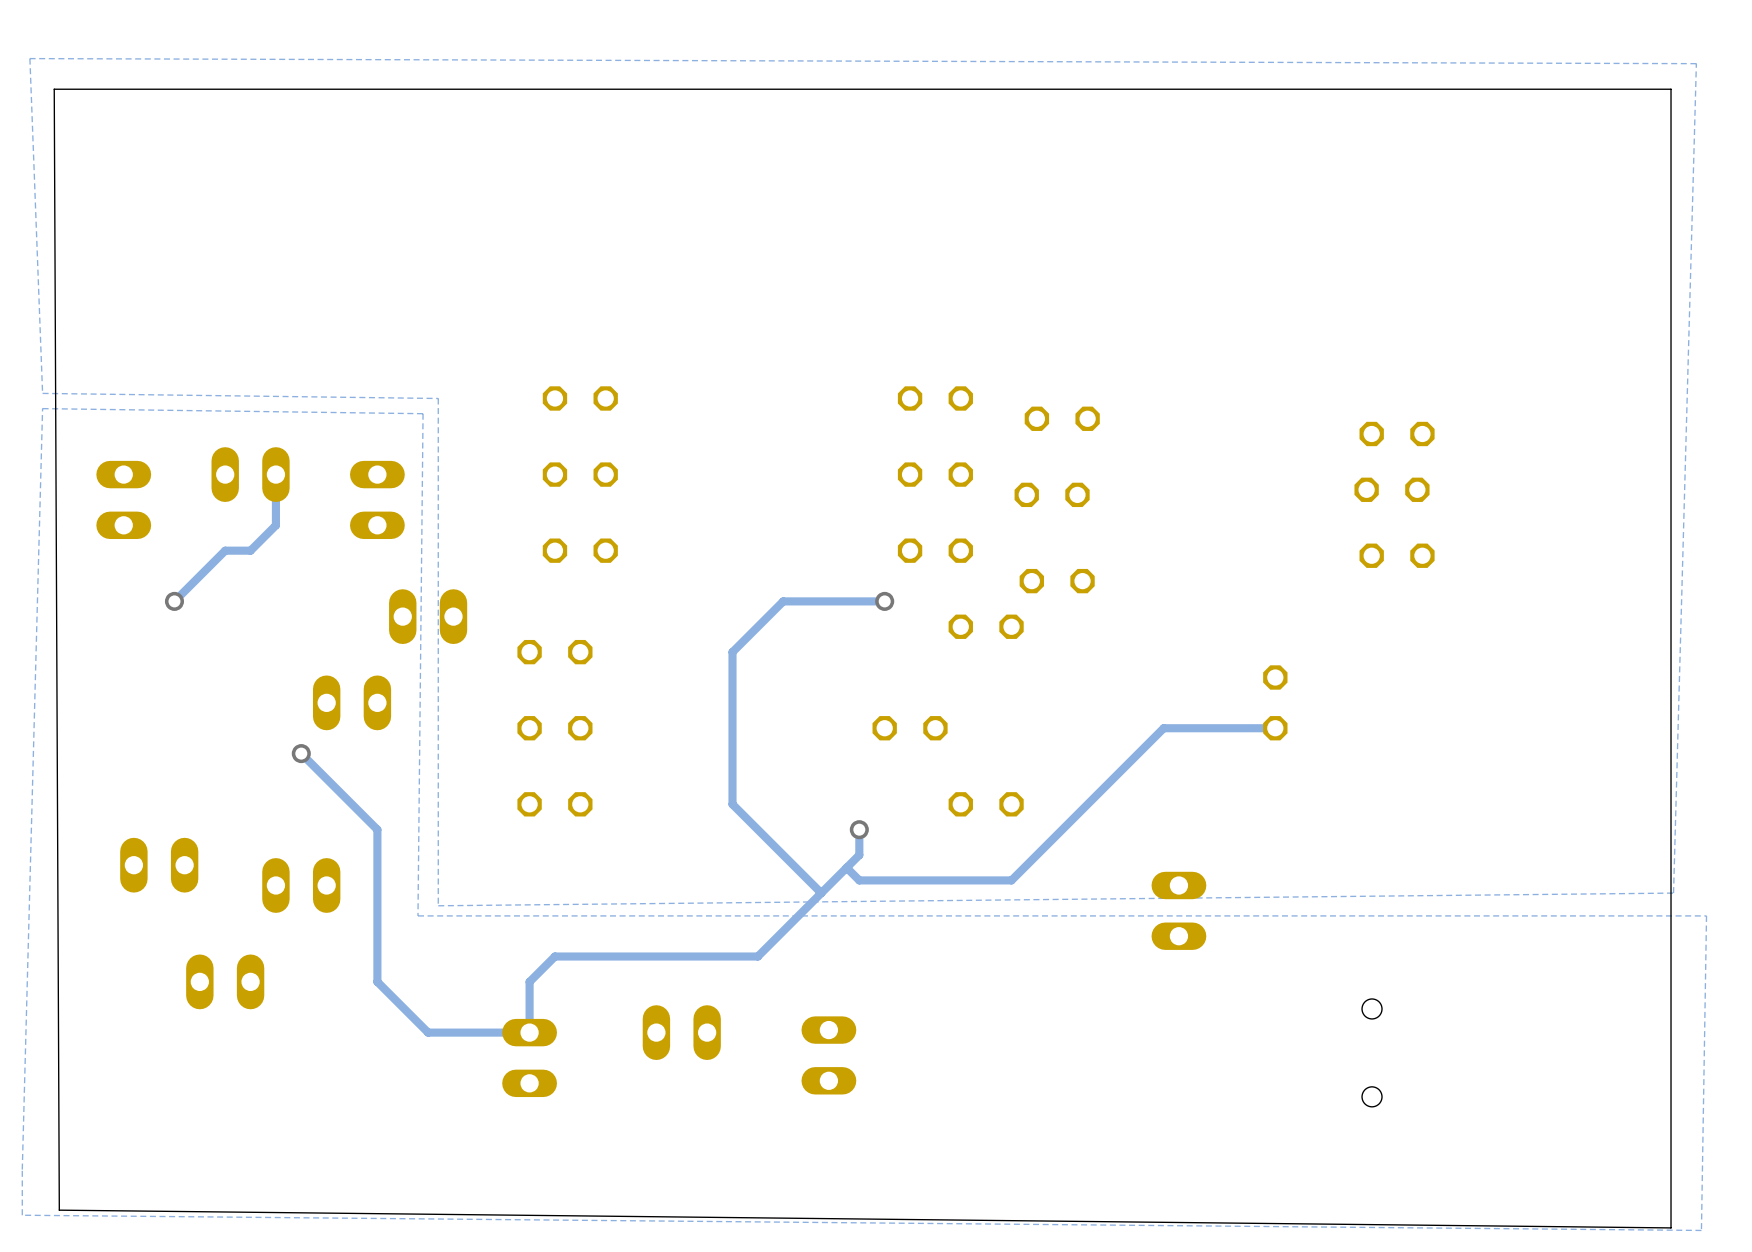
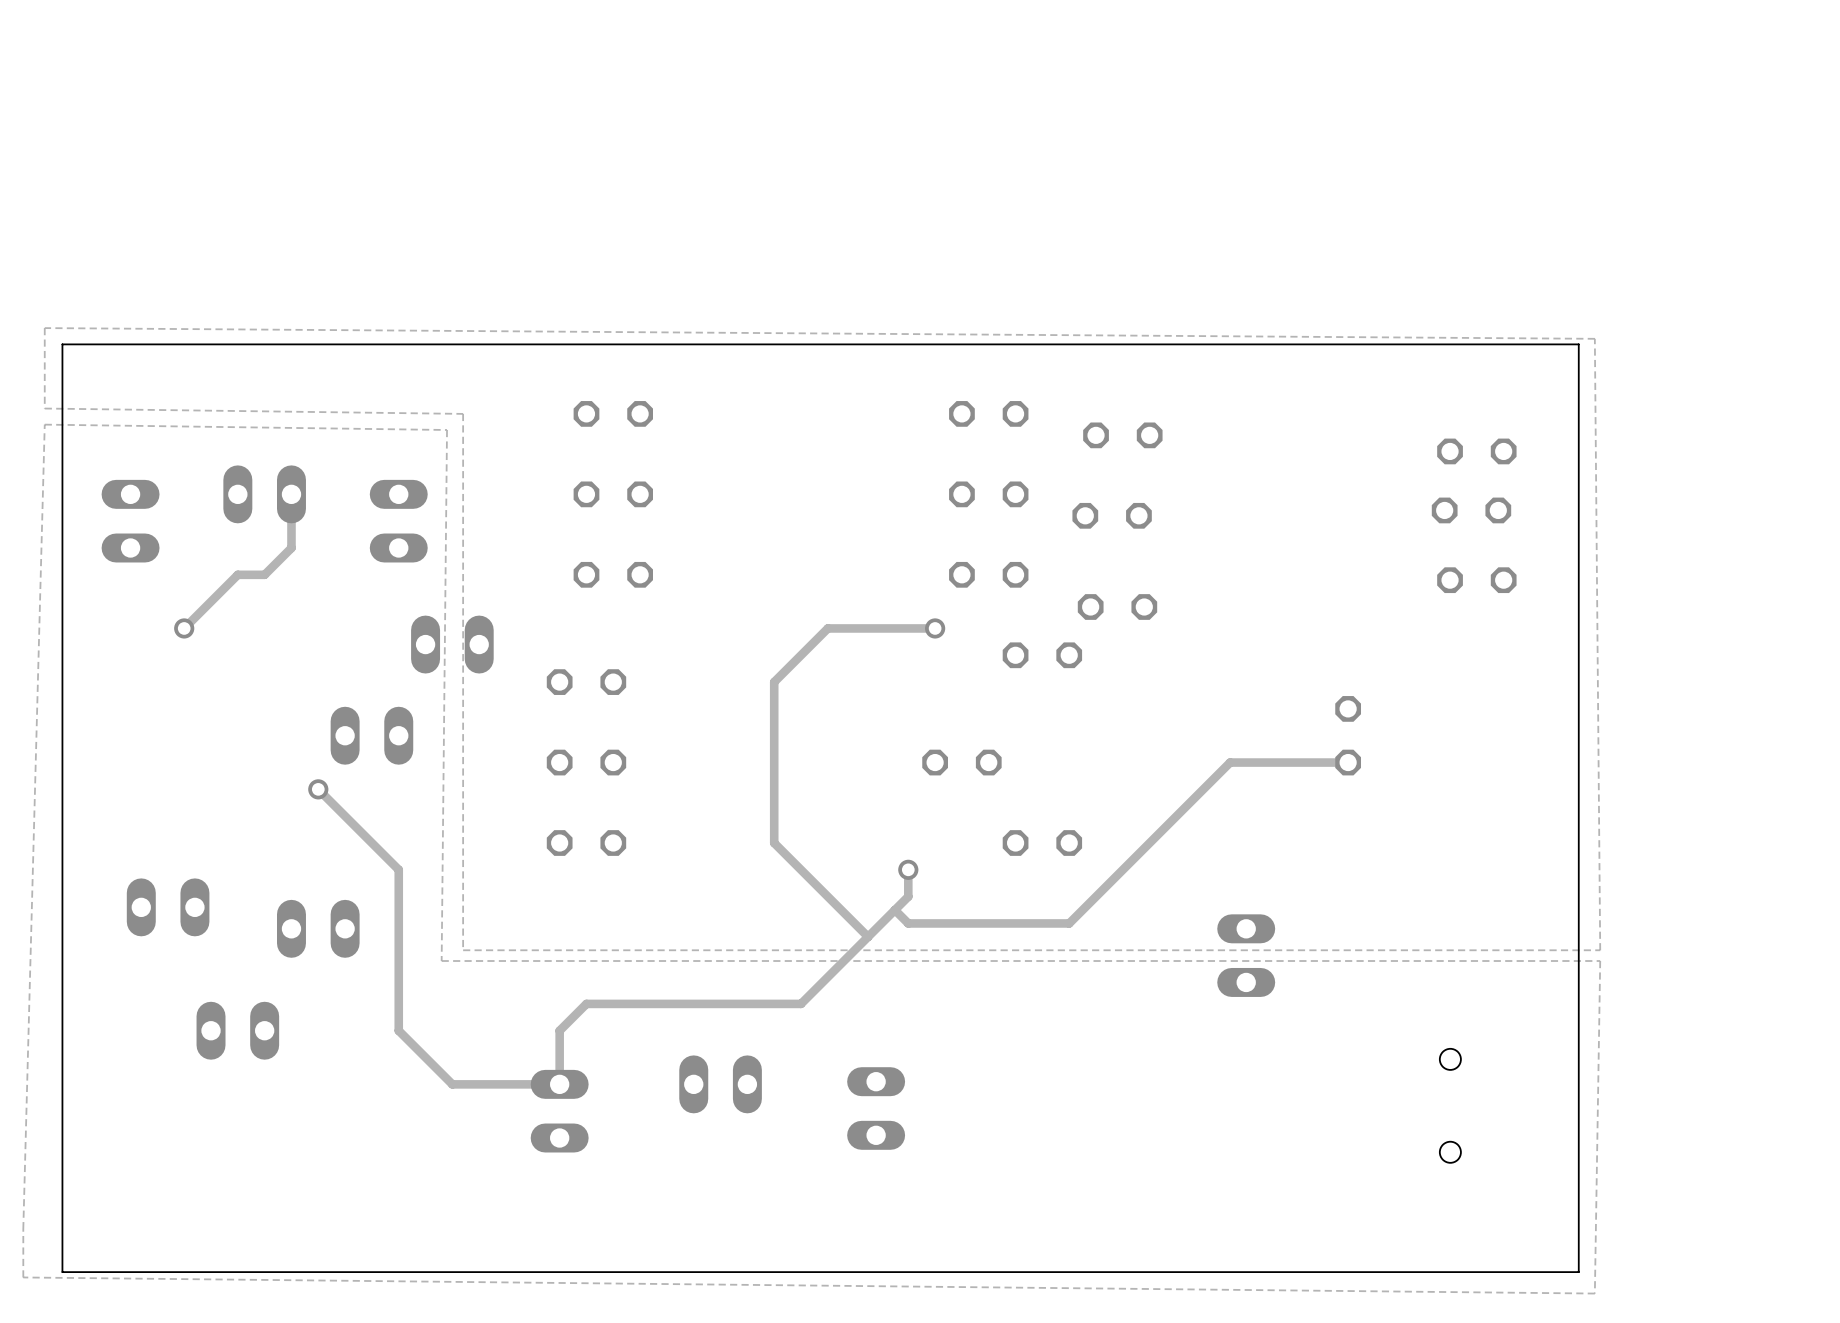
board edge: (1671, 89) (54, 89) (59, 1210) (1671, 1227) (1671, 89) -> (1578, 344) (1578, 1272) (62, 1272) (62, 344) (1578, 344)
zone outline: (42, 393) (29, 58) (1696, 63) (1673, 893) (438, 905) -> (44, 408) (44, 328) (1594, 338) (1600, 950) (463, 950)
zone outline: (1513, 915) (1706, 915) (1701, 1230) (22, 1215) -> (1600, 961) (1594, 1293) (23, 1277)

